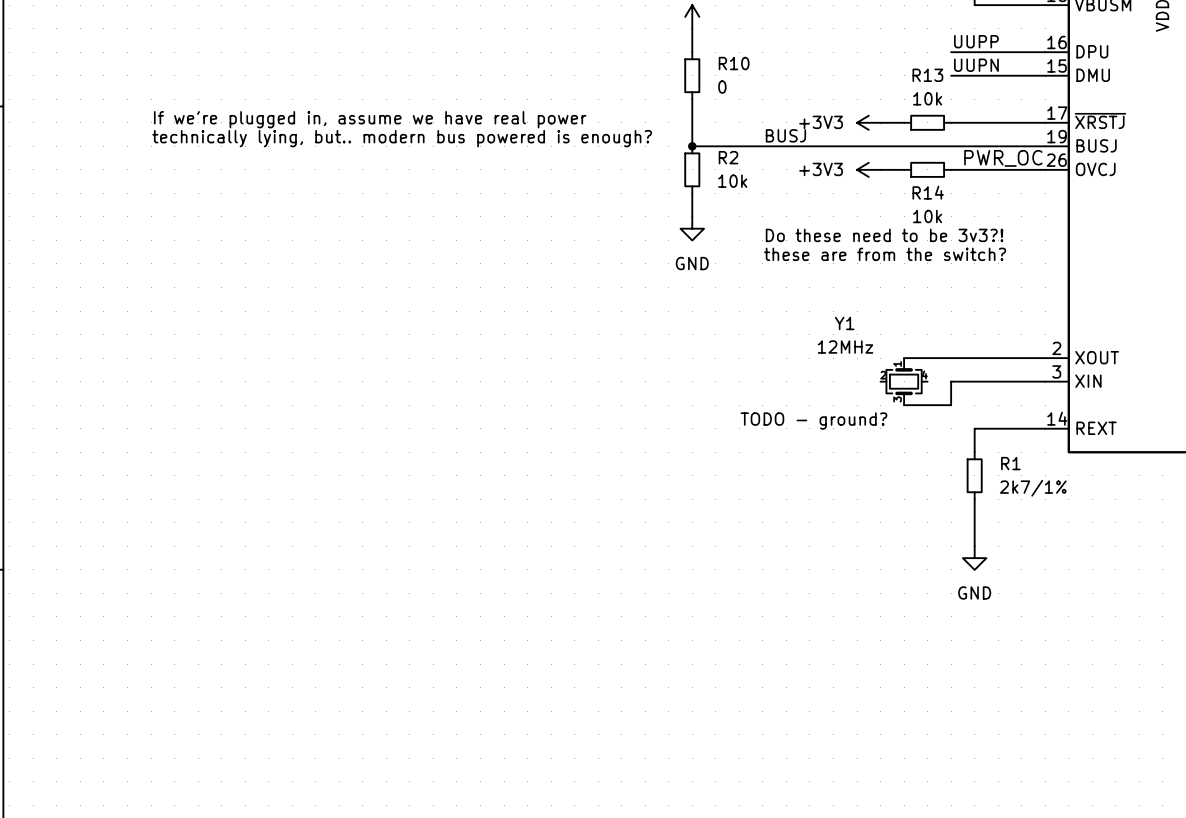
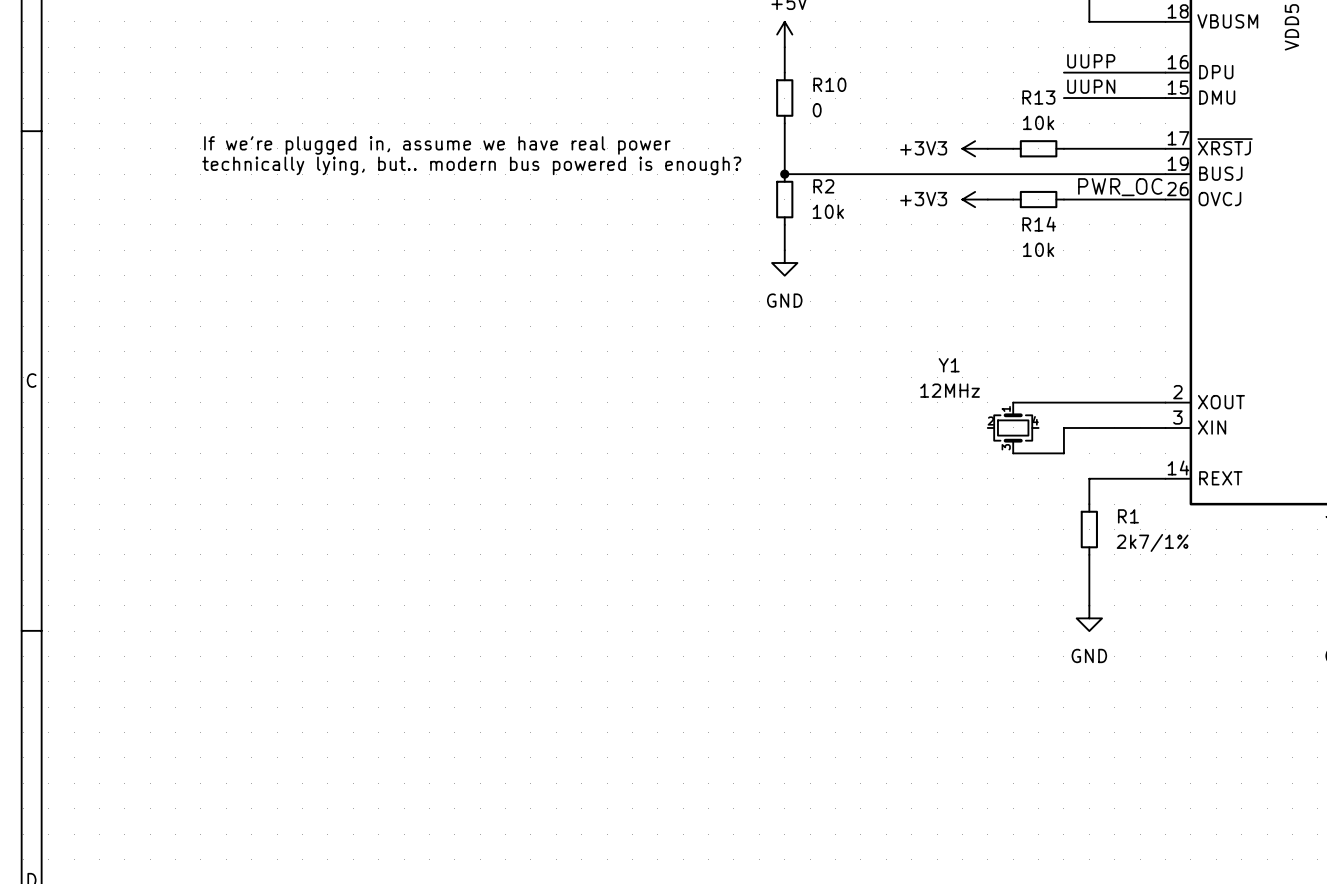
label: BUSJ (785, 135) -> none
text: Do these need to be 3v3?! (884, 235) -> none
text: these are from the switch? (885, 254) -> none
text: TODO - ground? (813, 421) -> none

